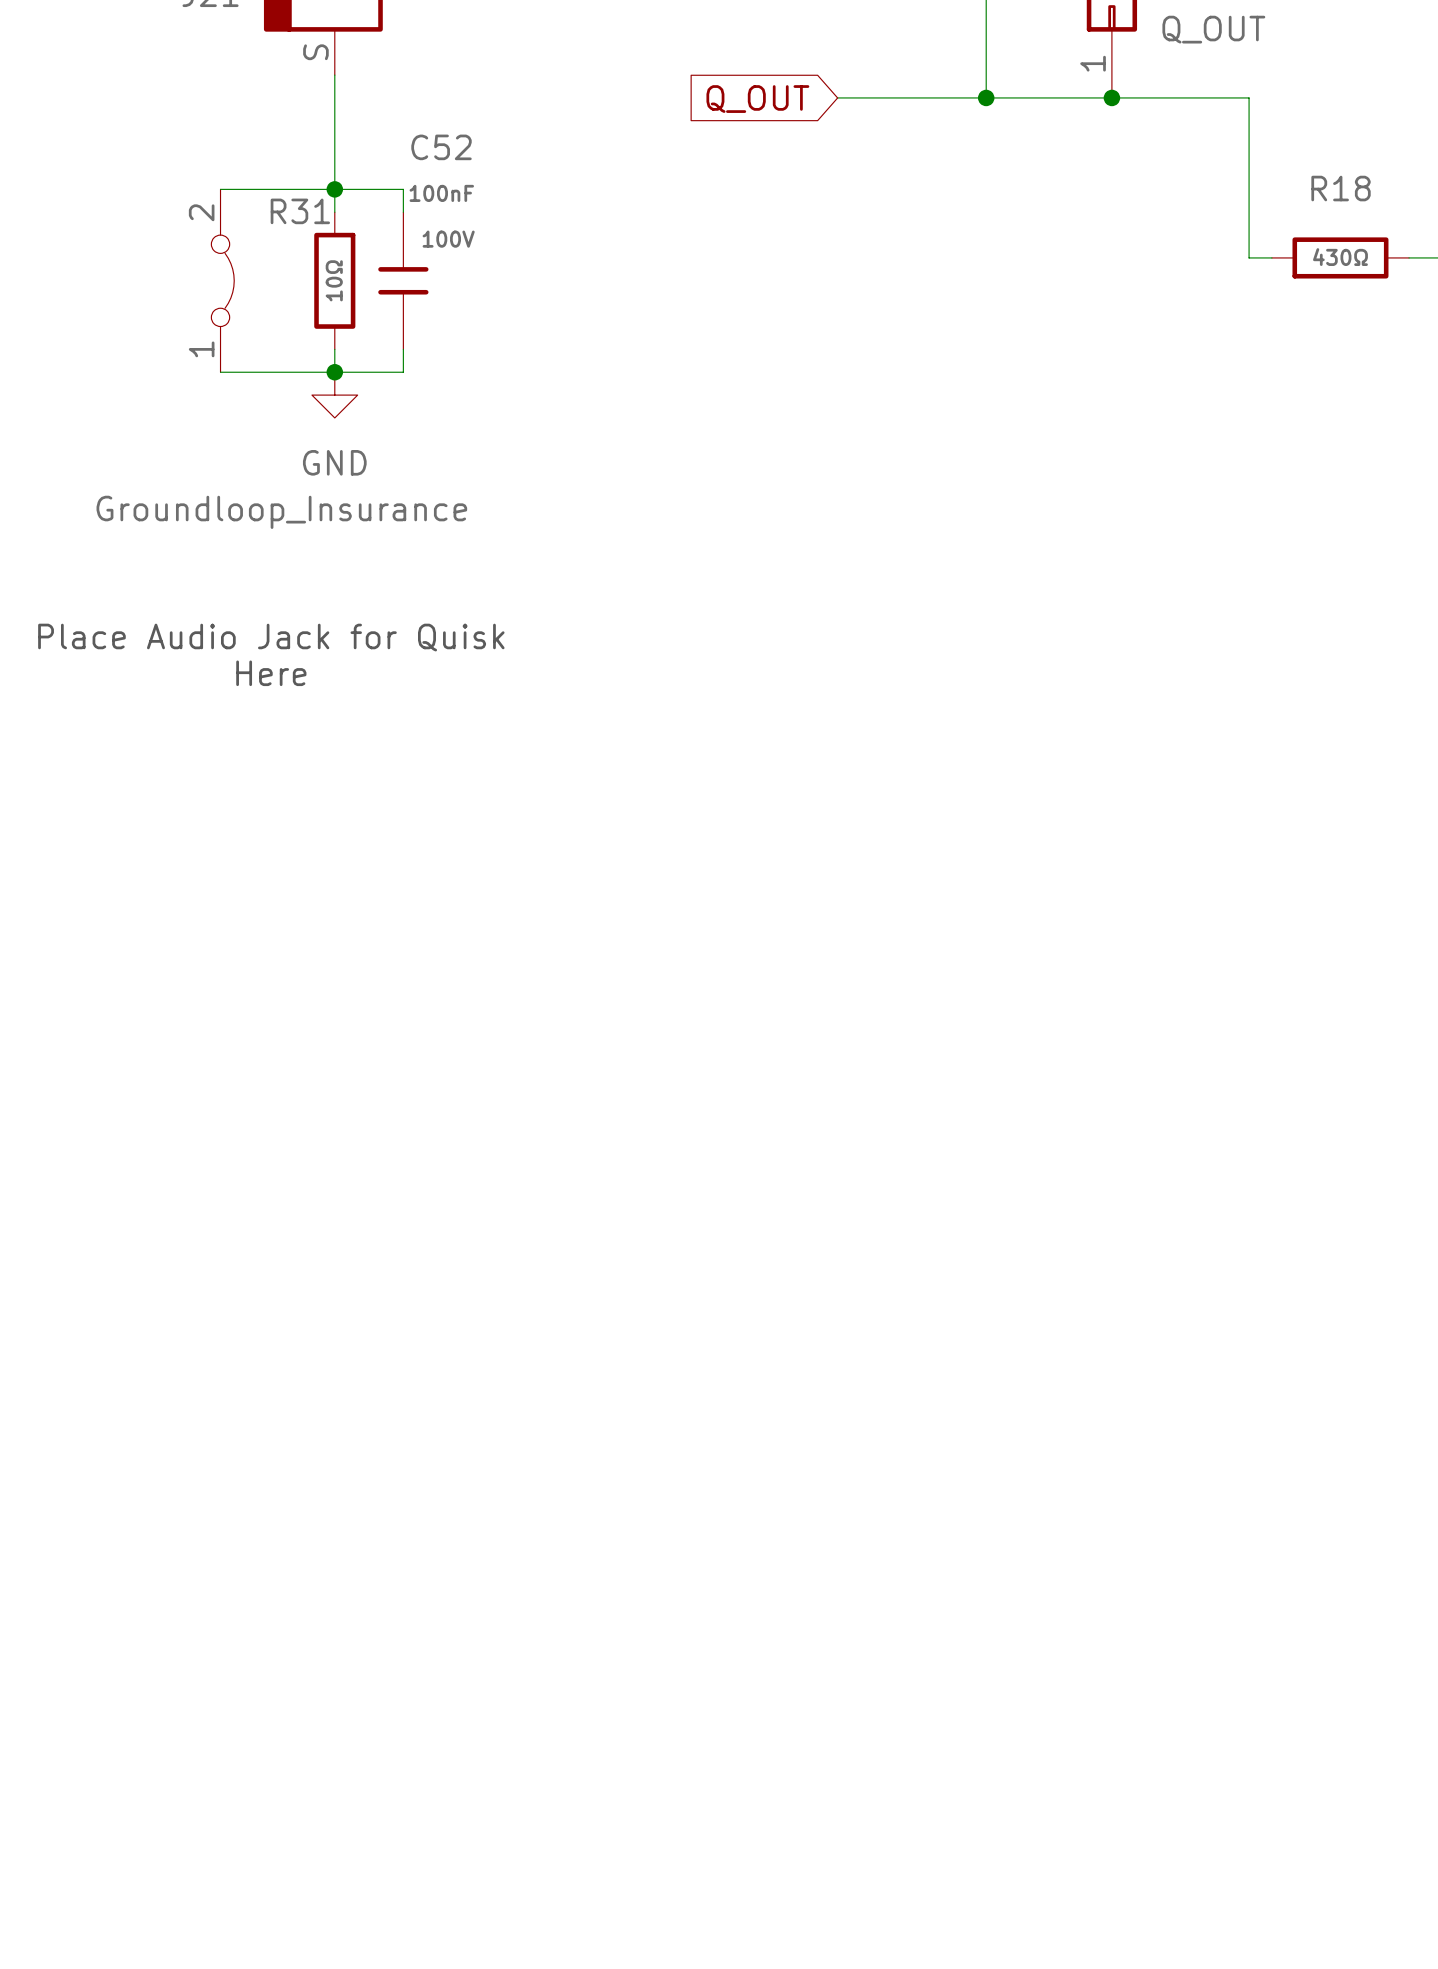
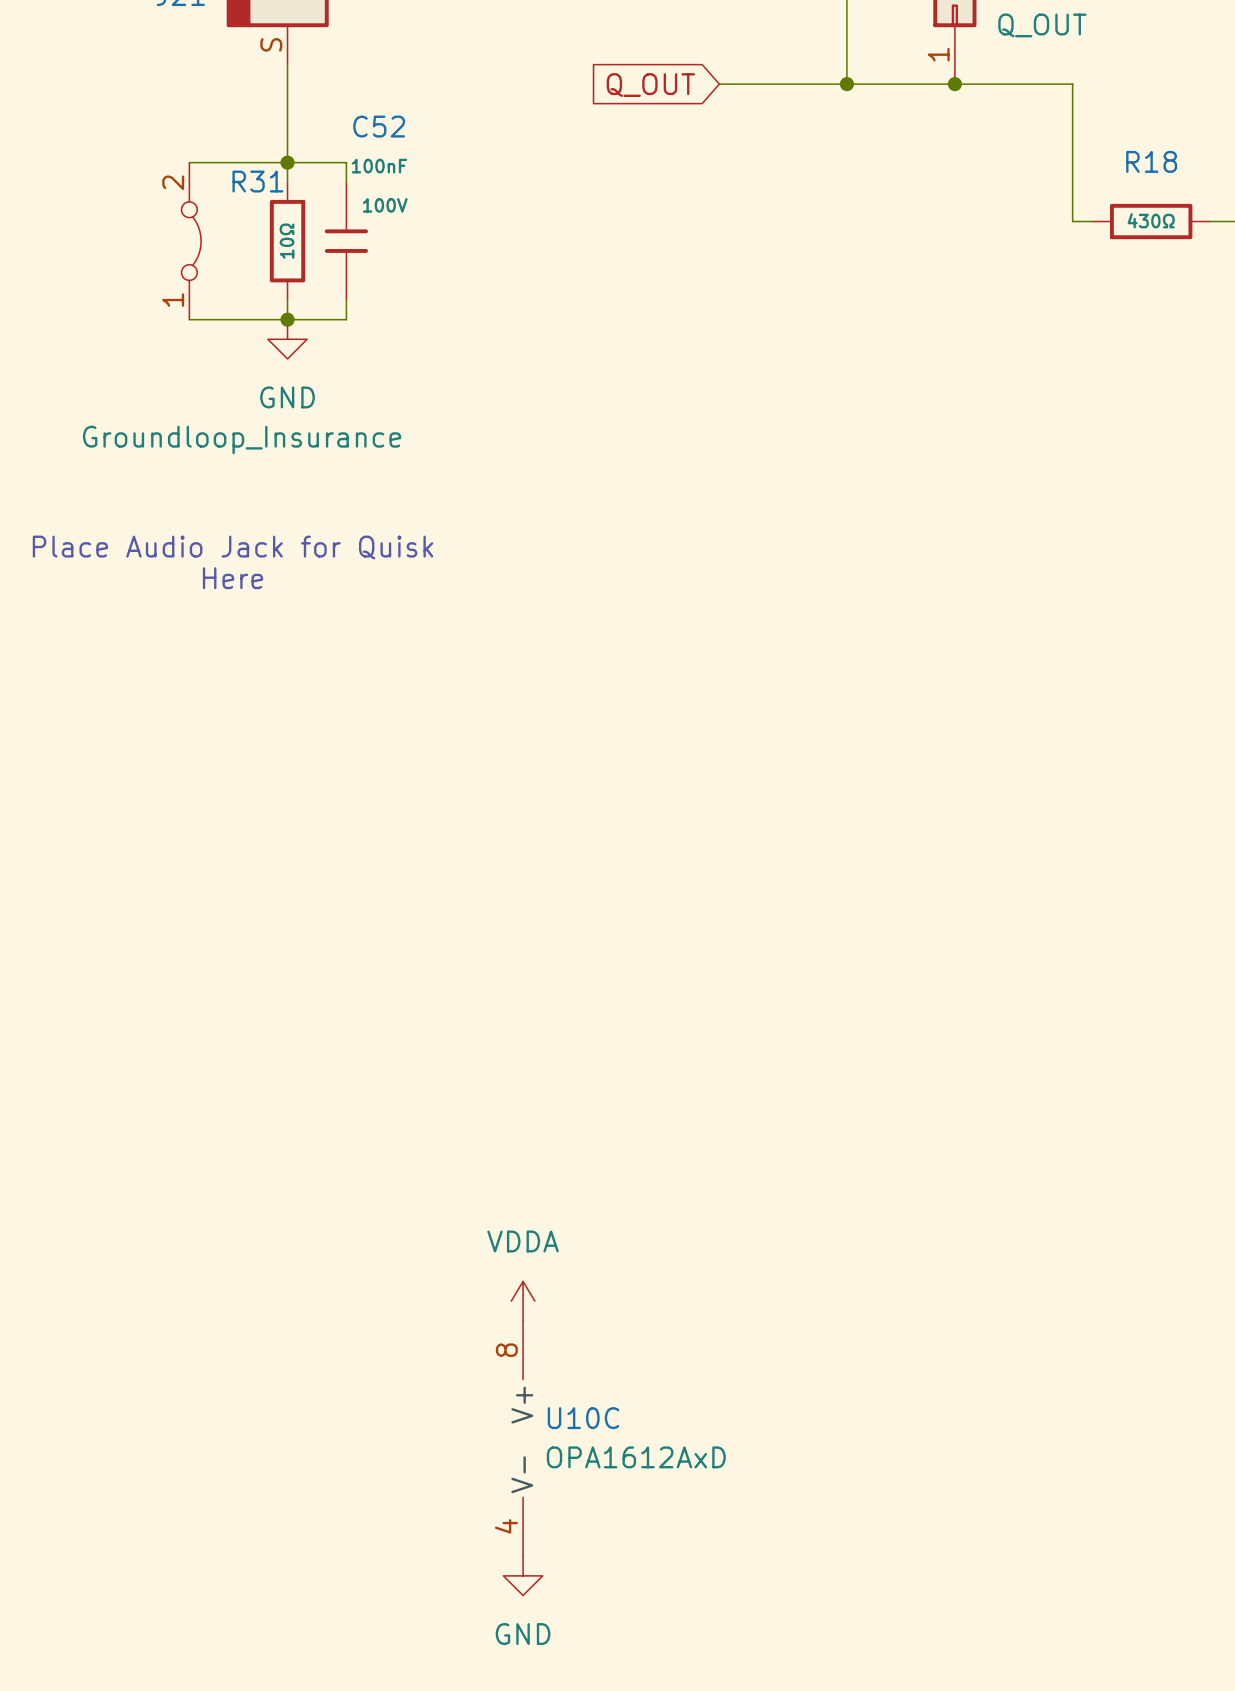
power symbol: none -> VDDA (523, 1301)
U10C: none -> OPA1612AxD (523, 1438)
power symbol: none -> GND (523, 1575)

